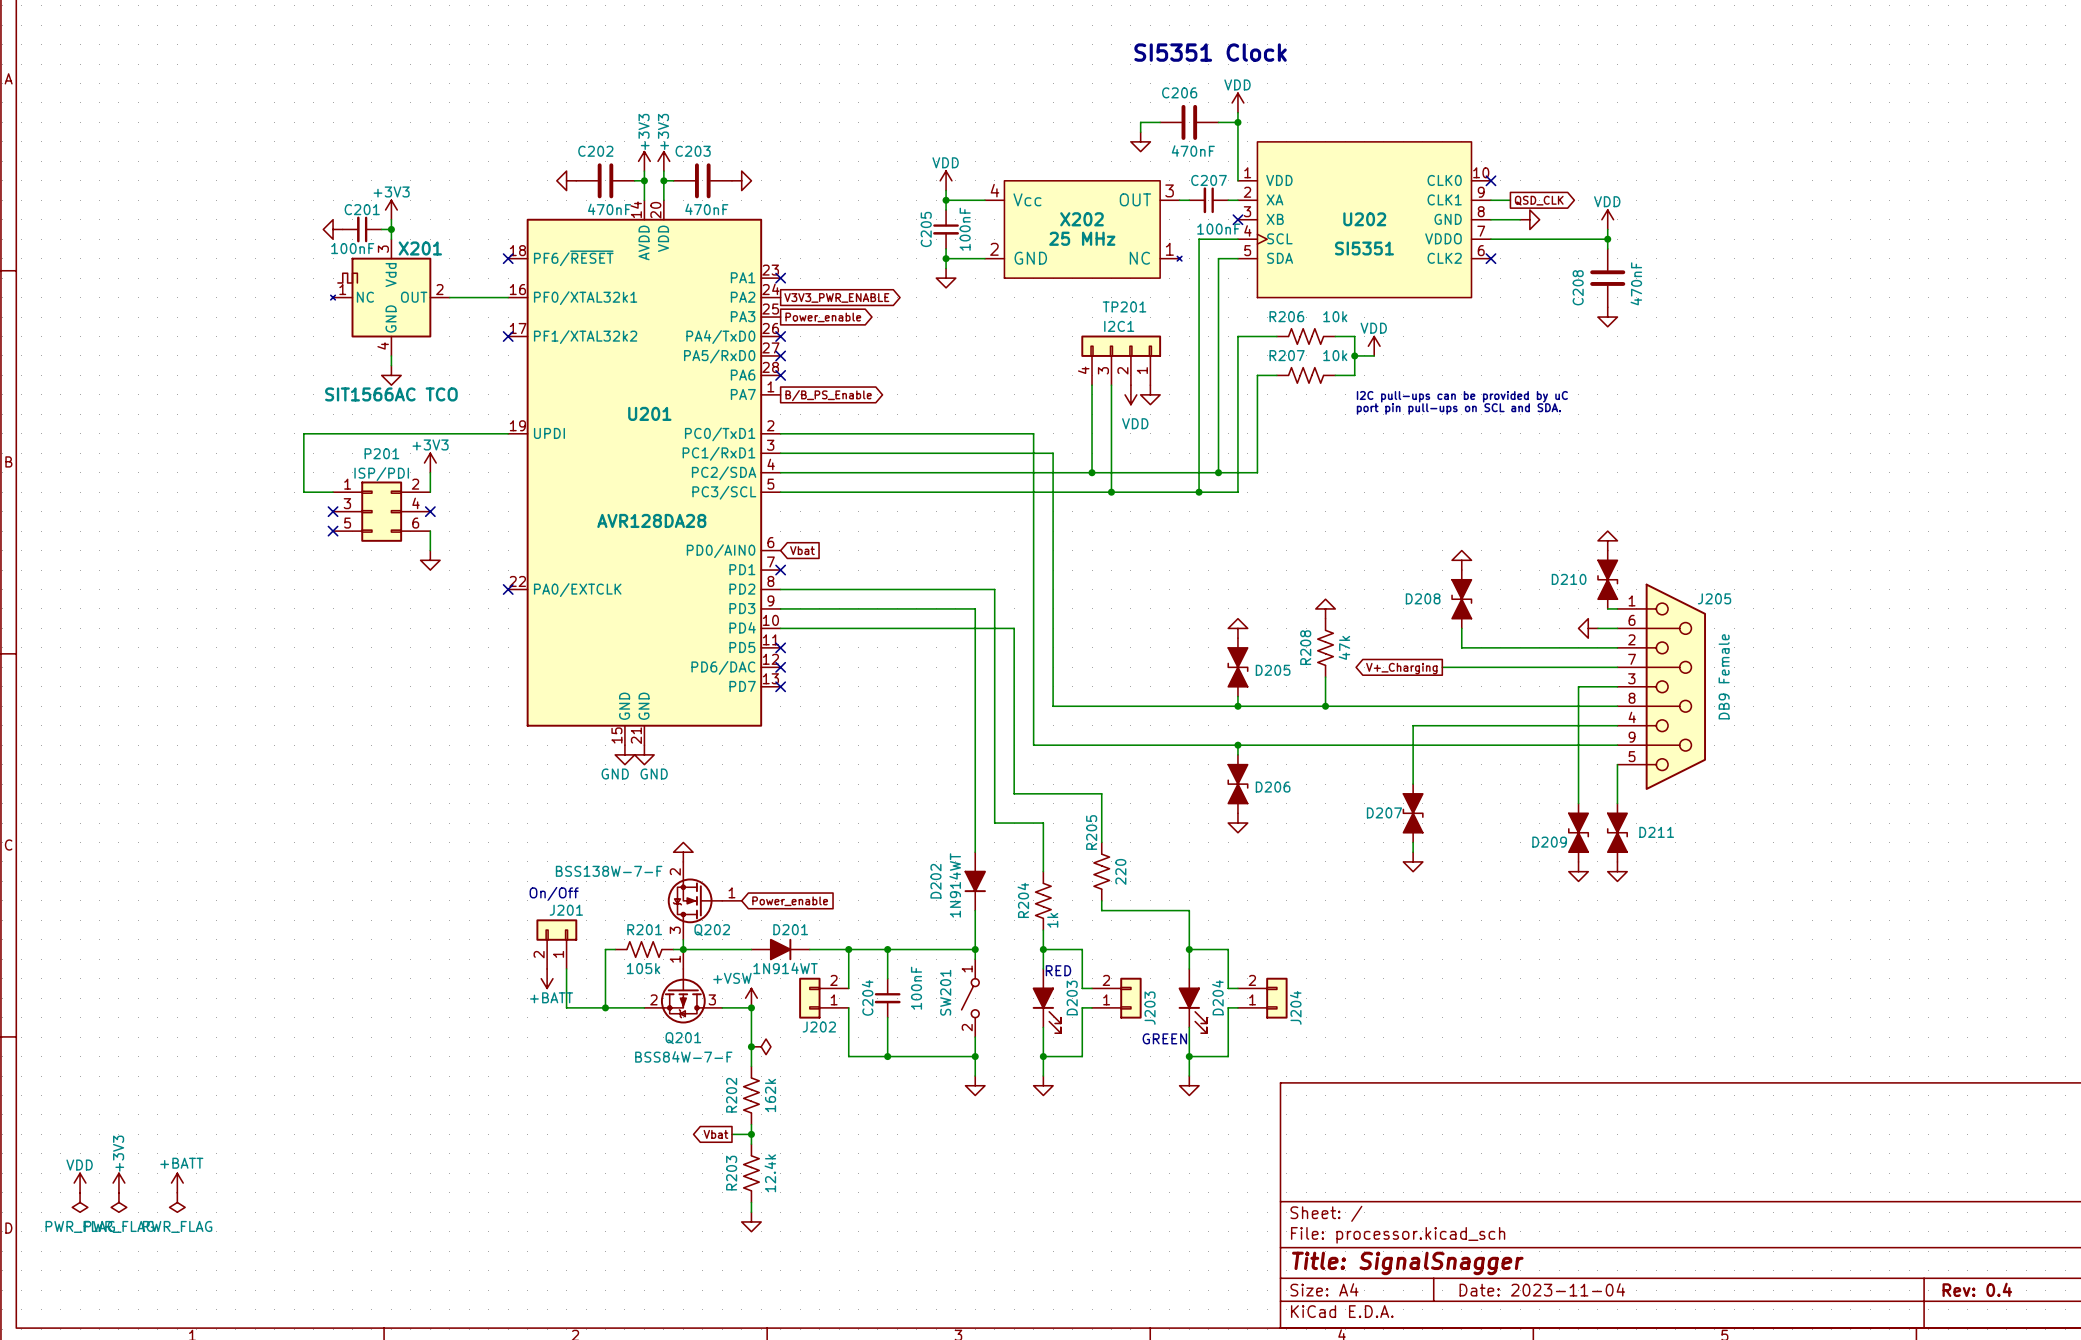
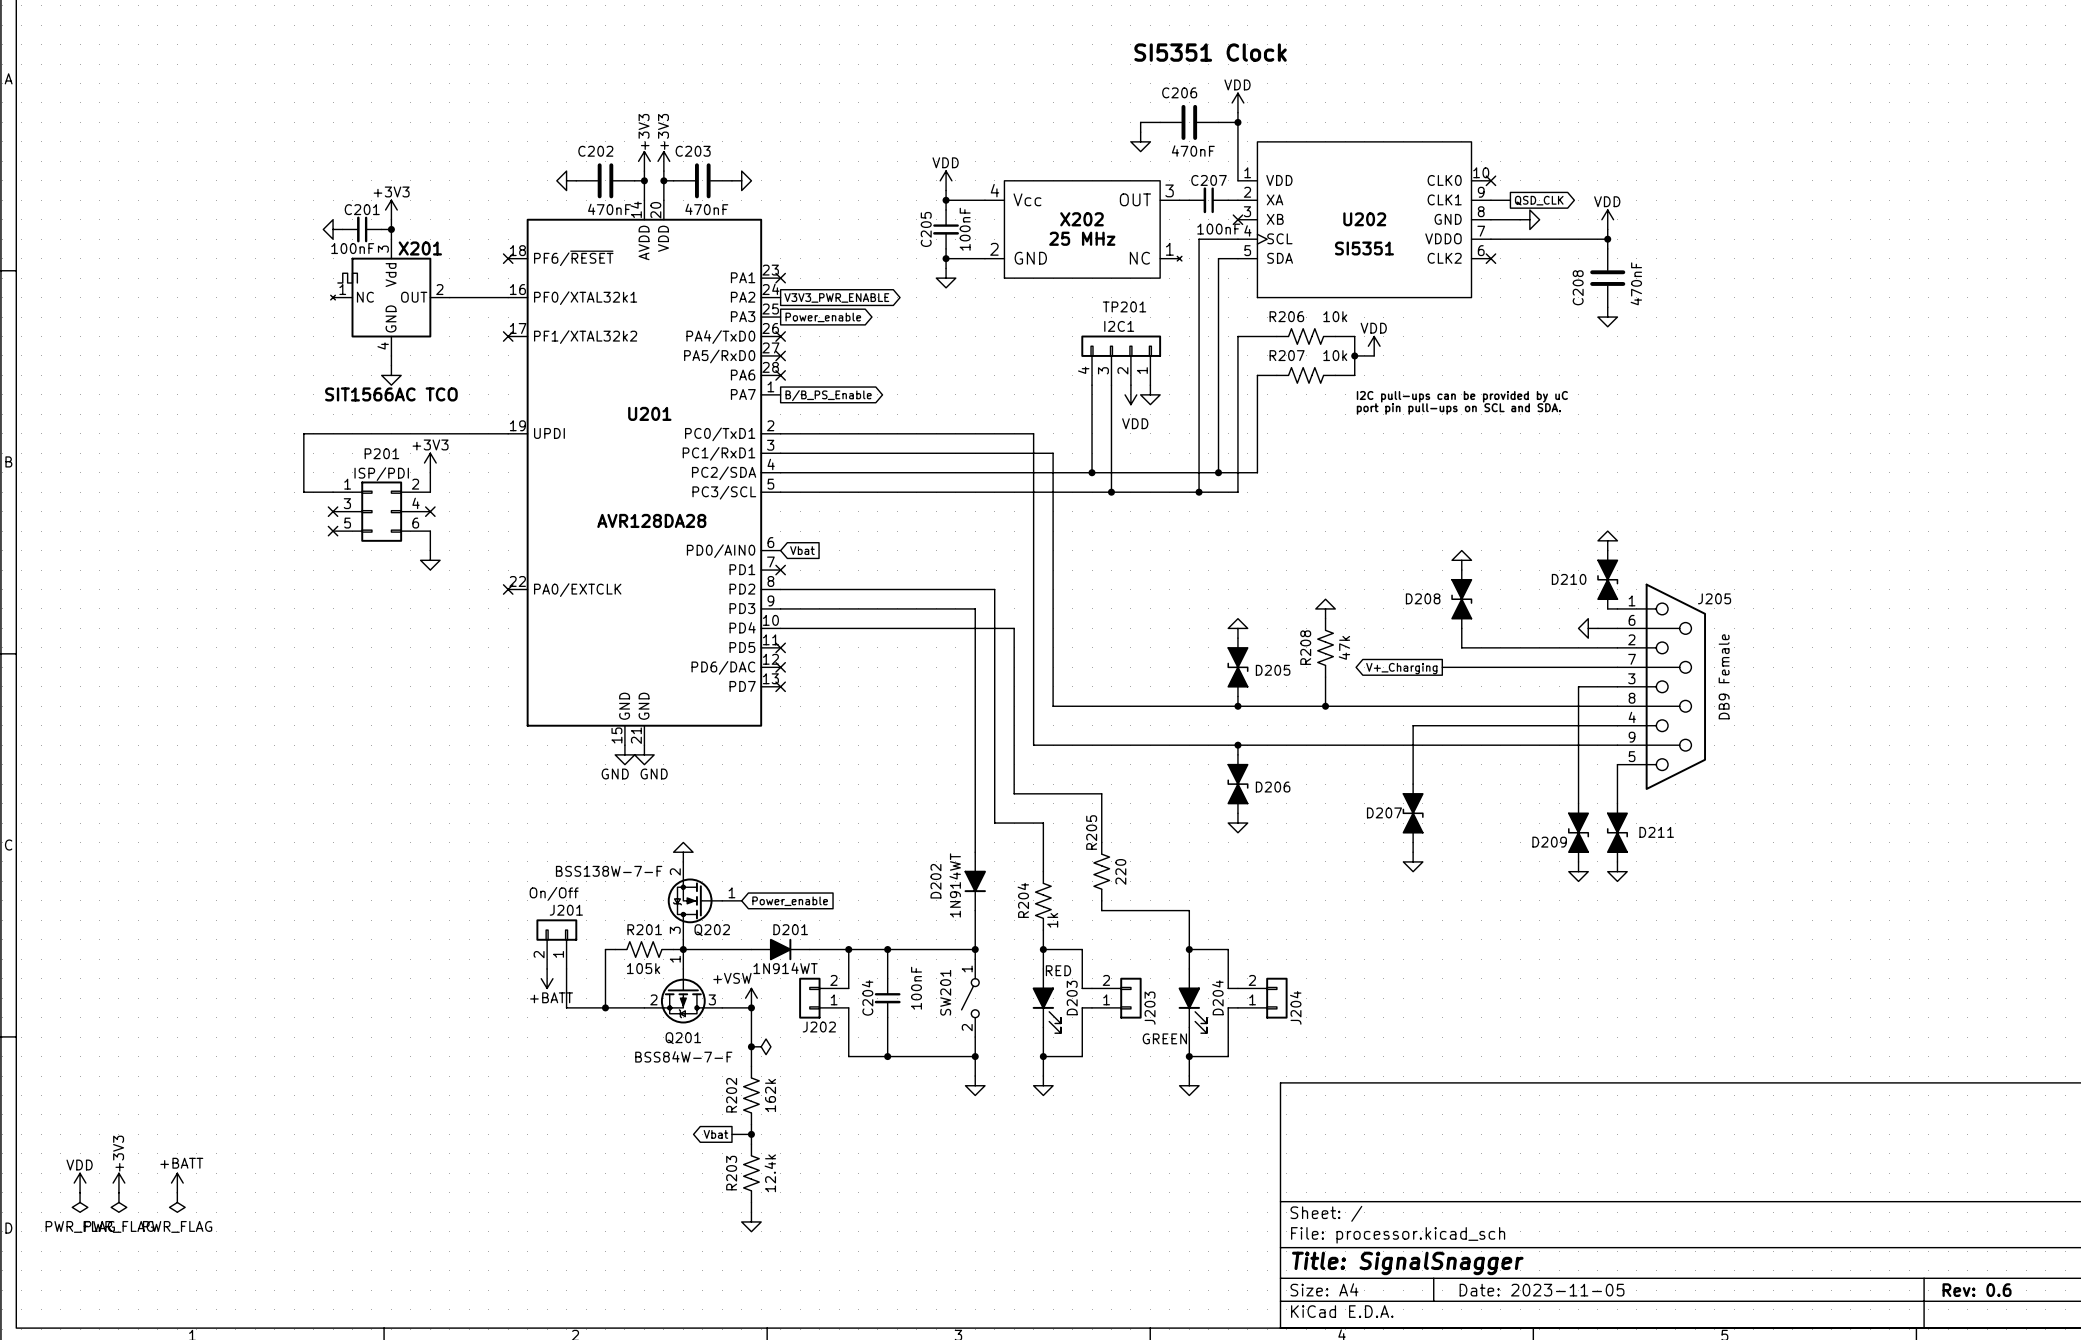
title block: Date: 2023-11-04 (1542, 1289) -> Date: 2023-11-05 (1542, 1290)
title block: Rev: 0.4 (1977, 1289) -> Rev: 0.6 (1977, 1290)

